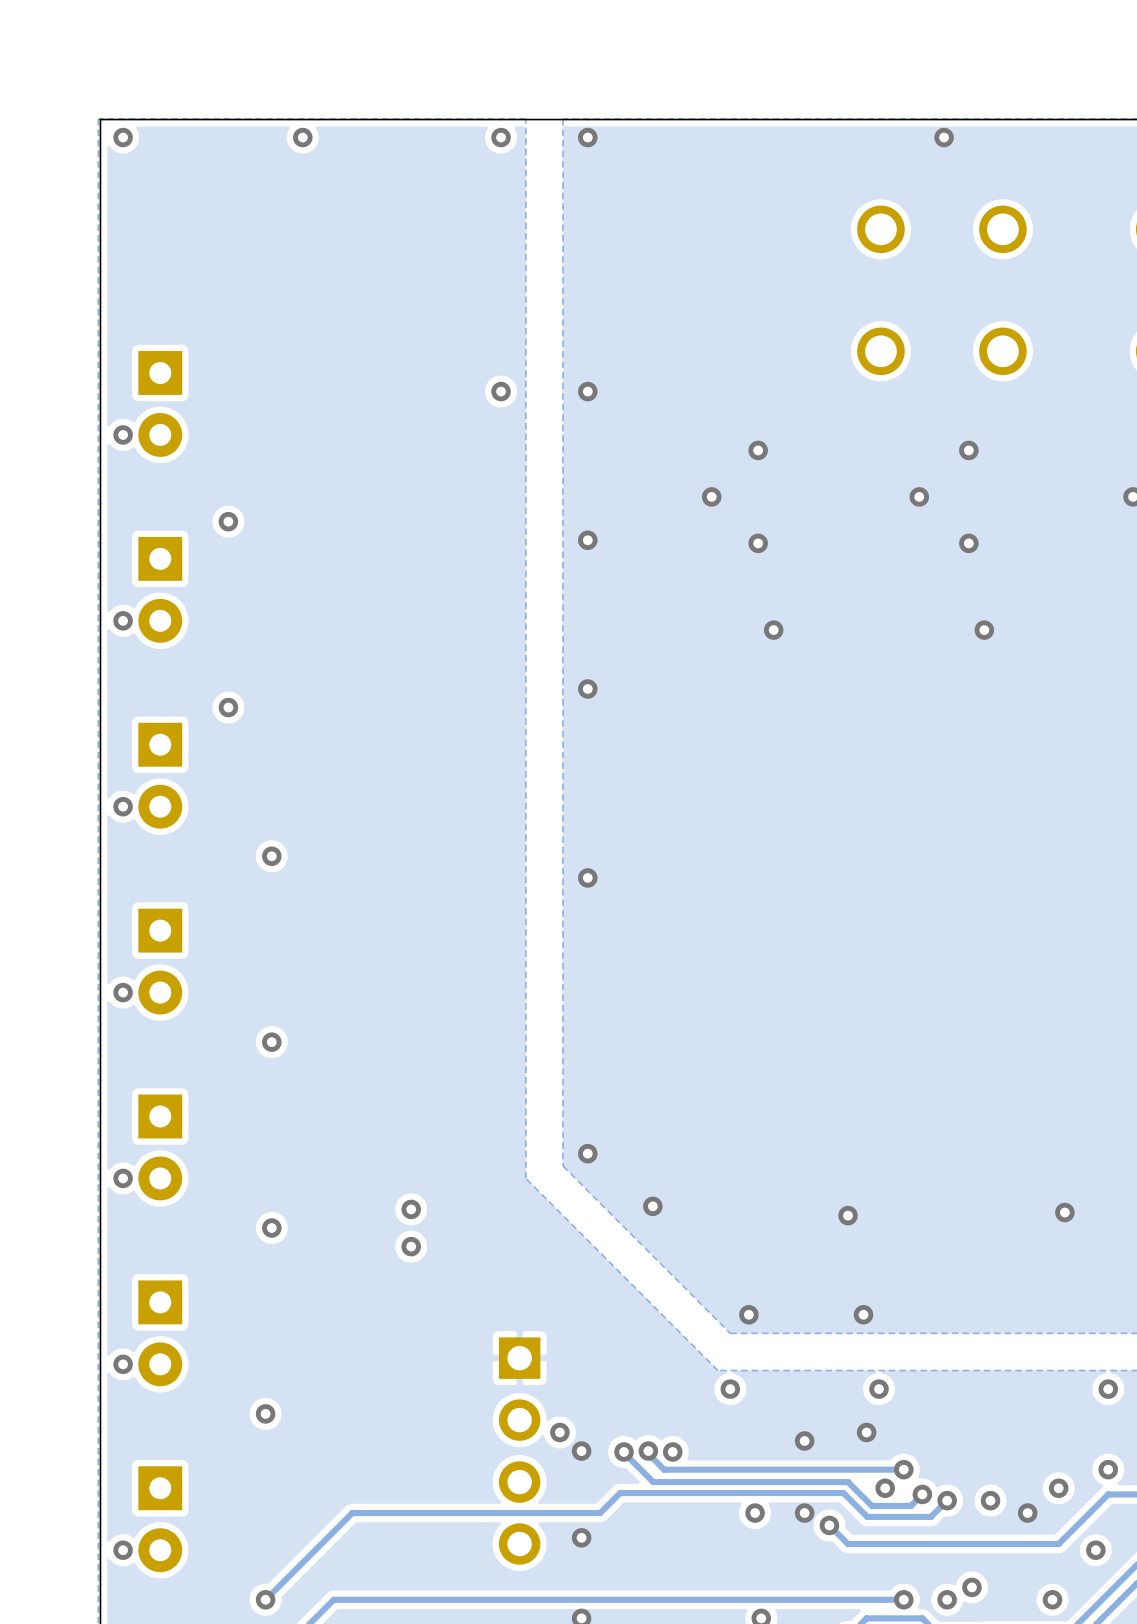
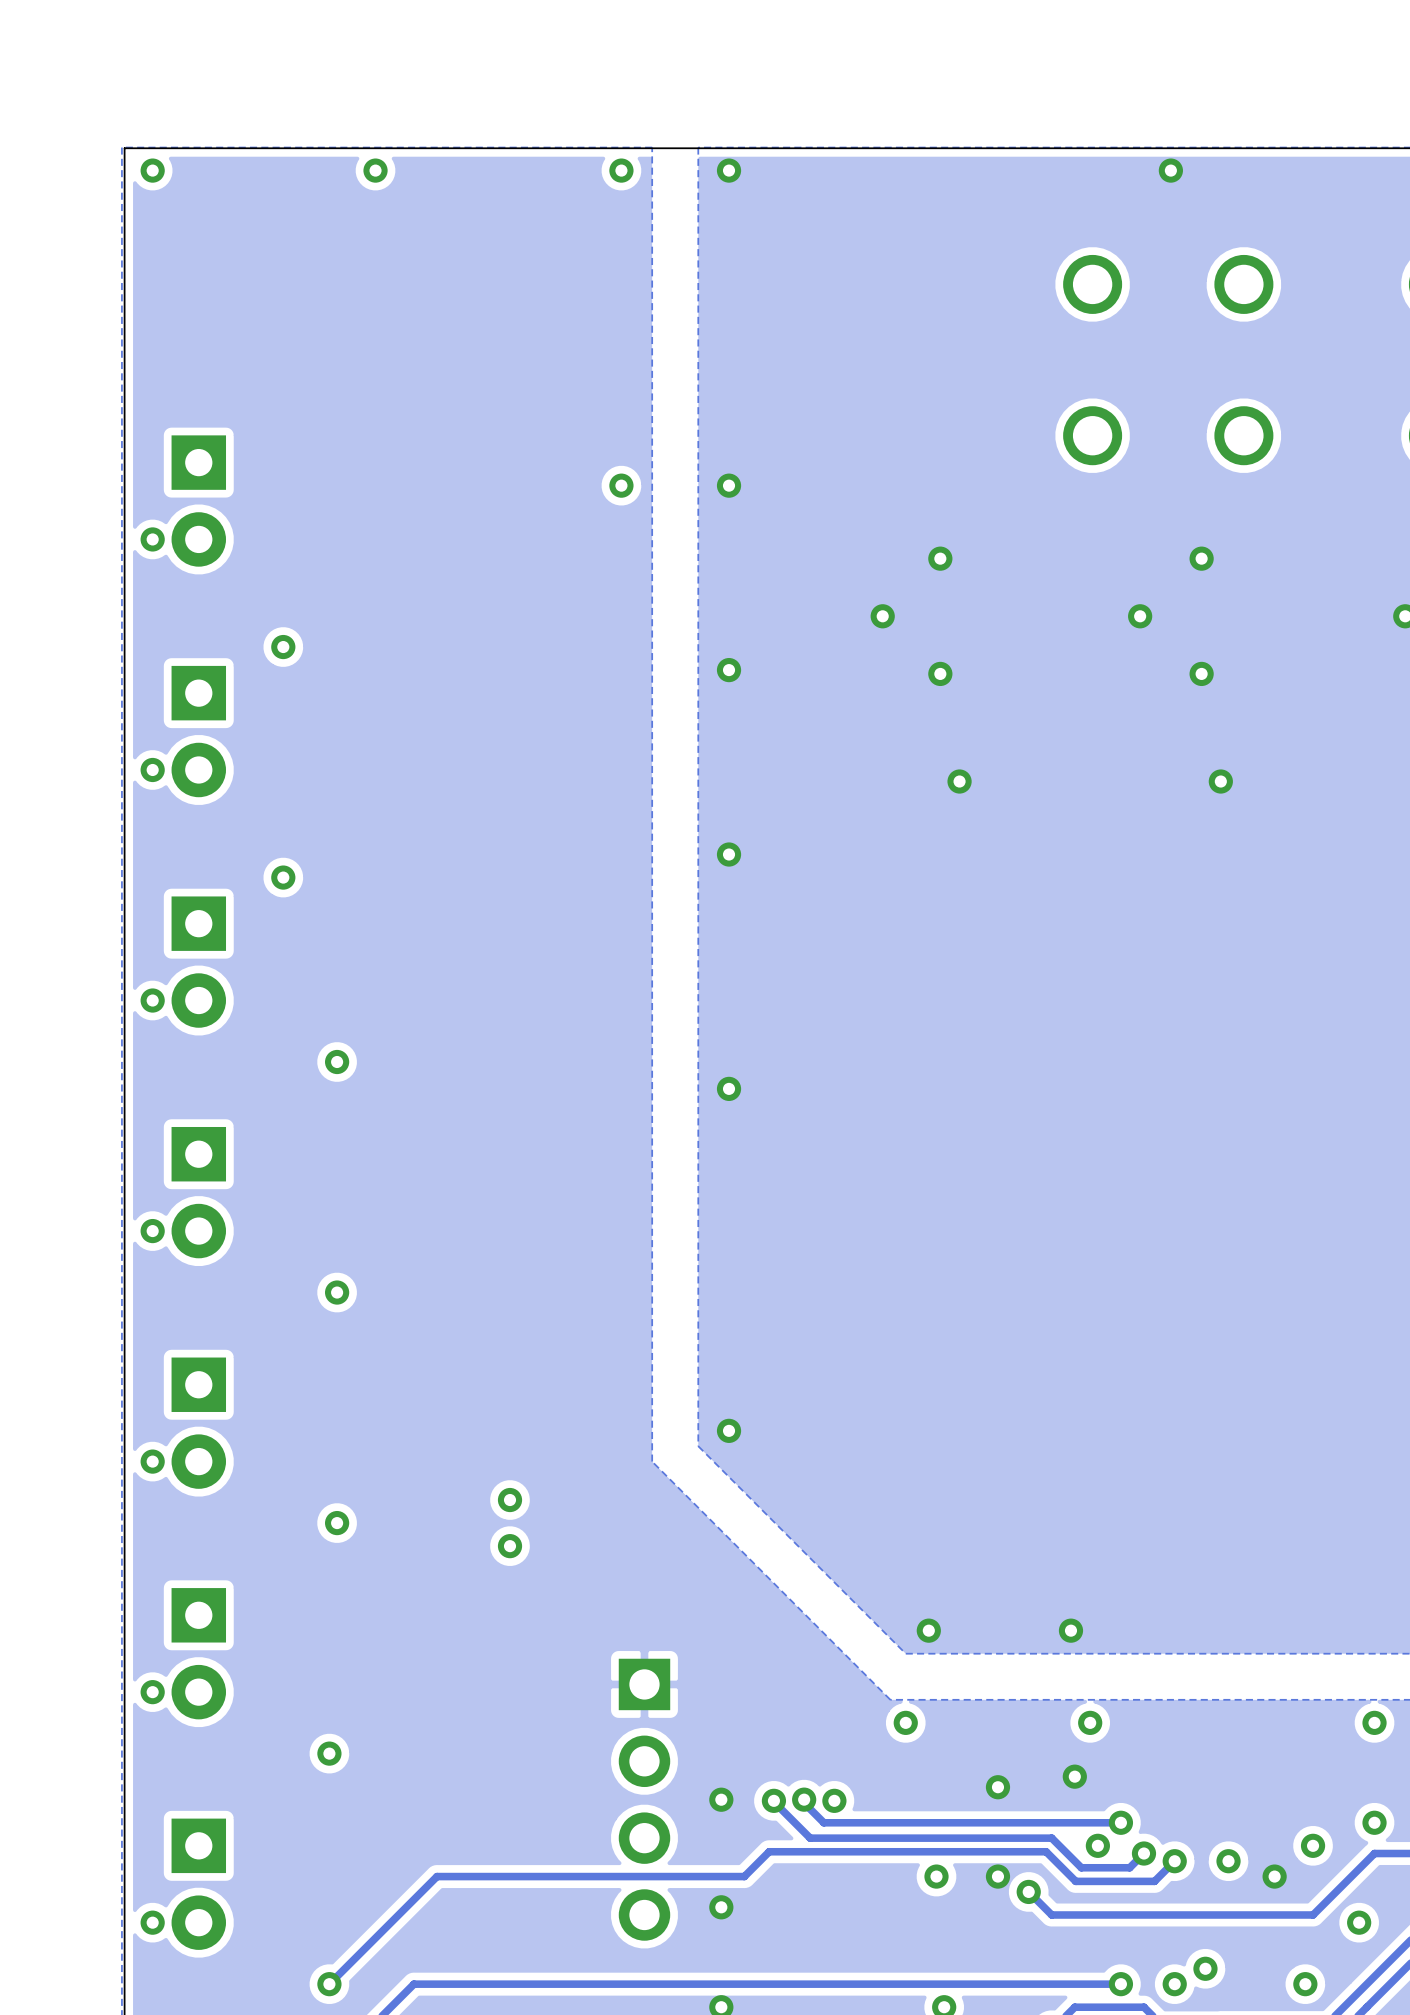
via: (652, 1206) -> none
via: (1064, 1212) -> none
via: (848, 1215) -> none
via: (559, 1432) -> none

